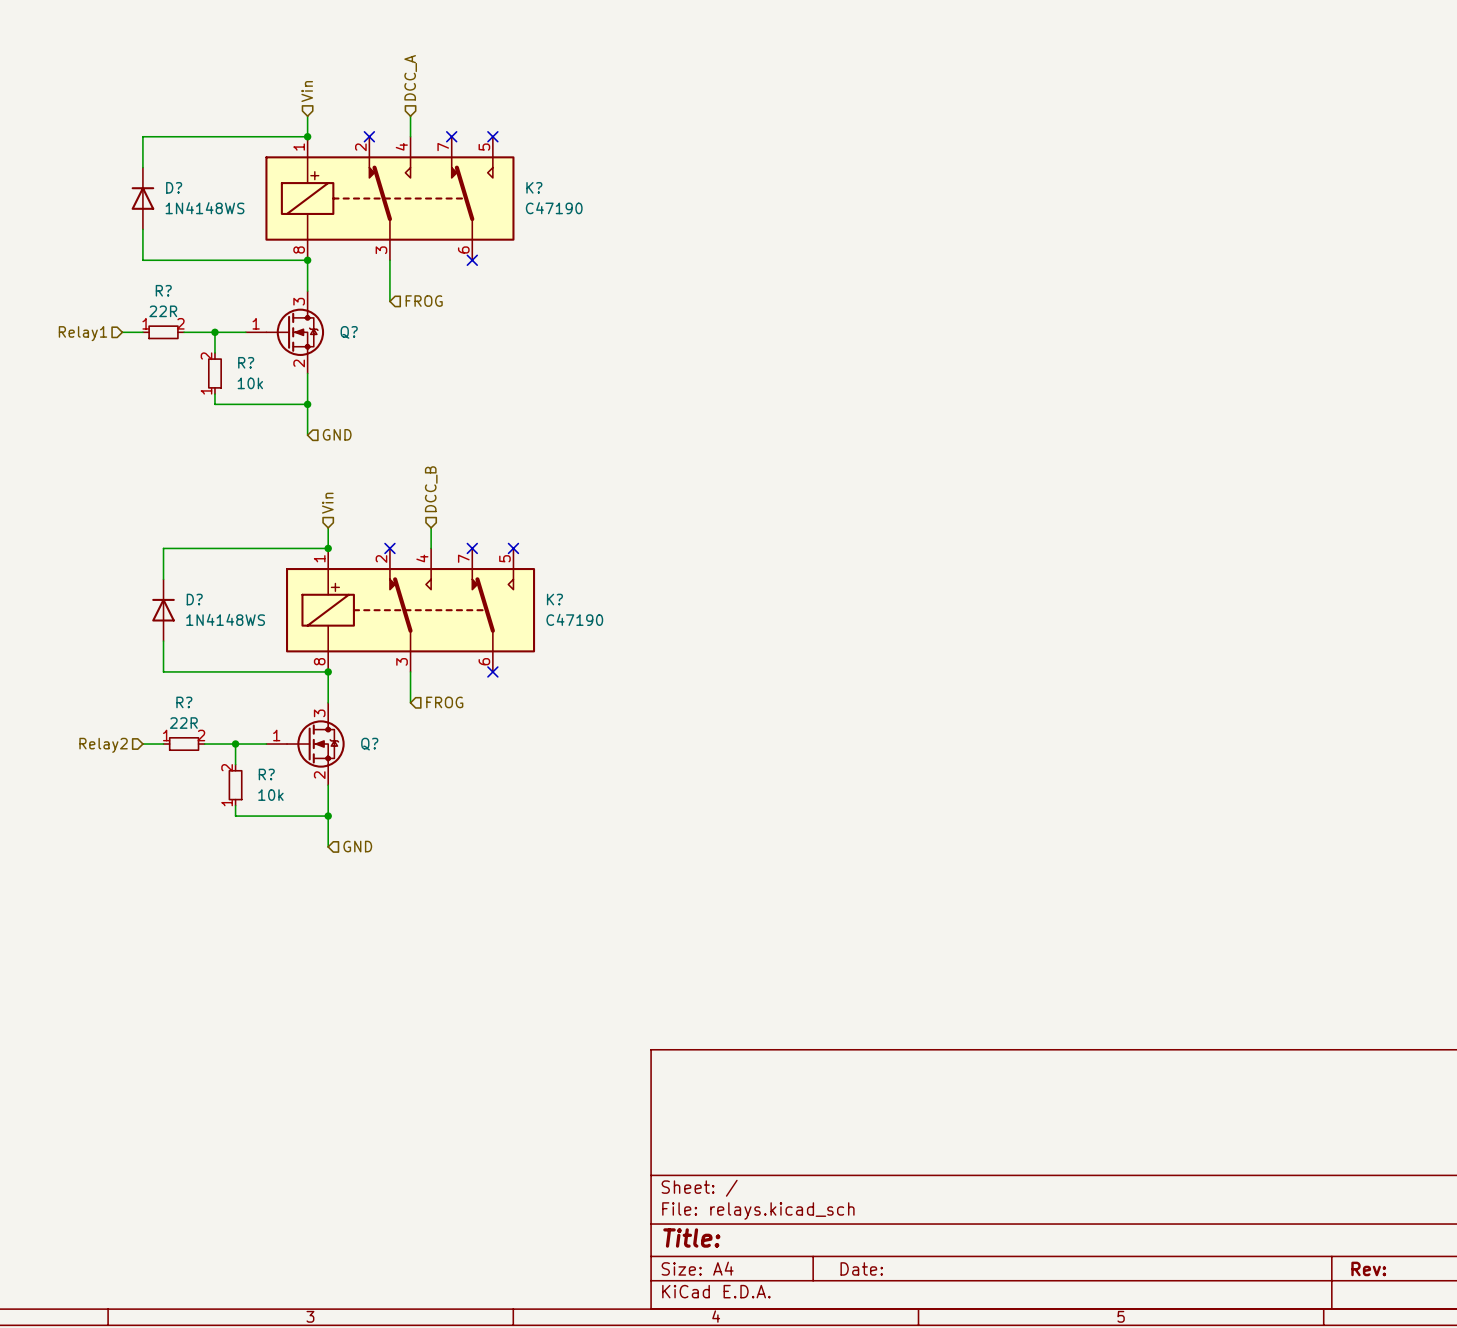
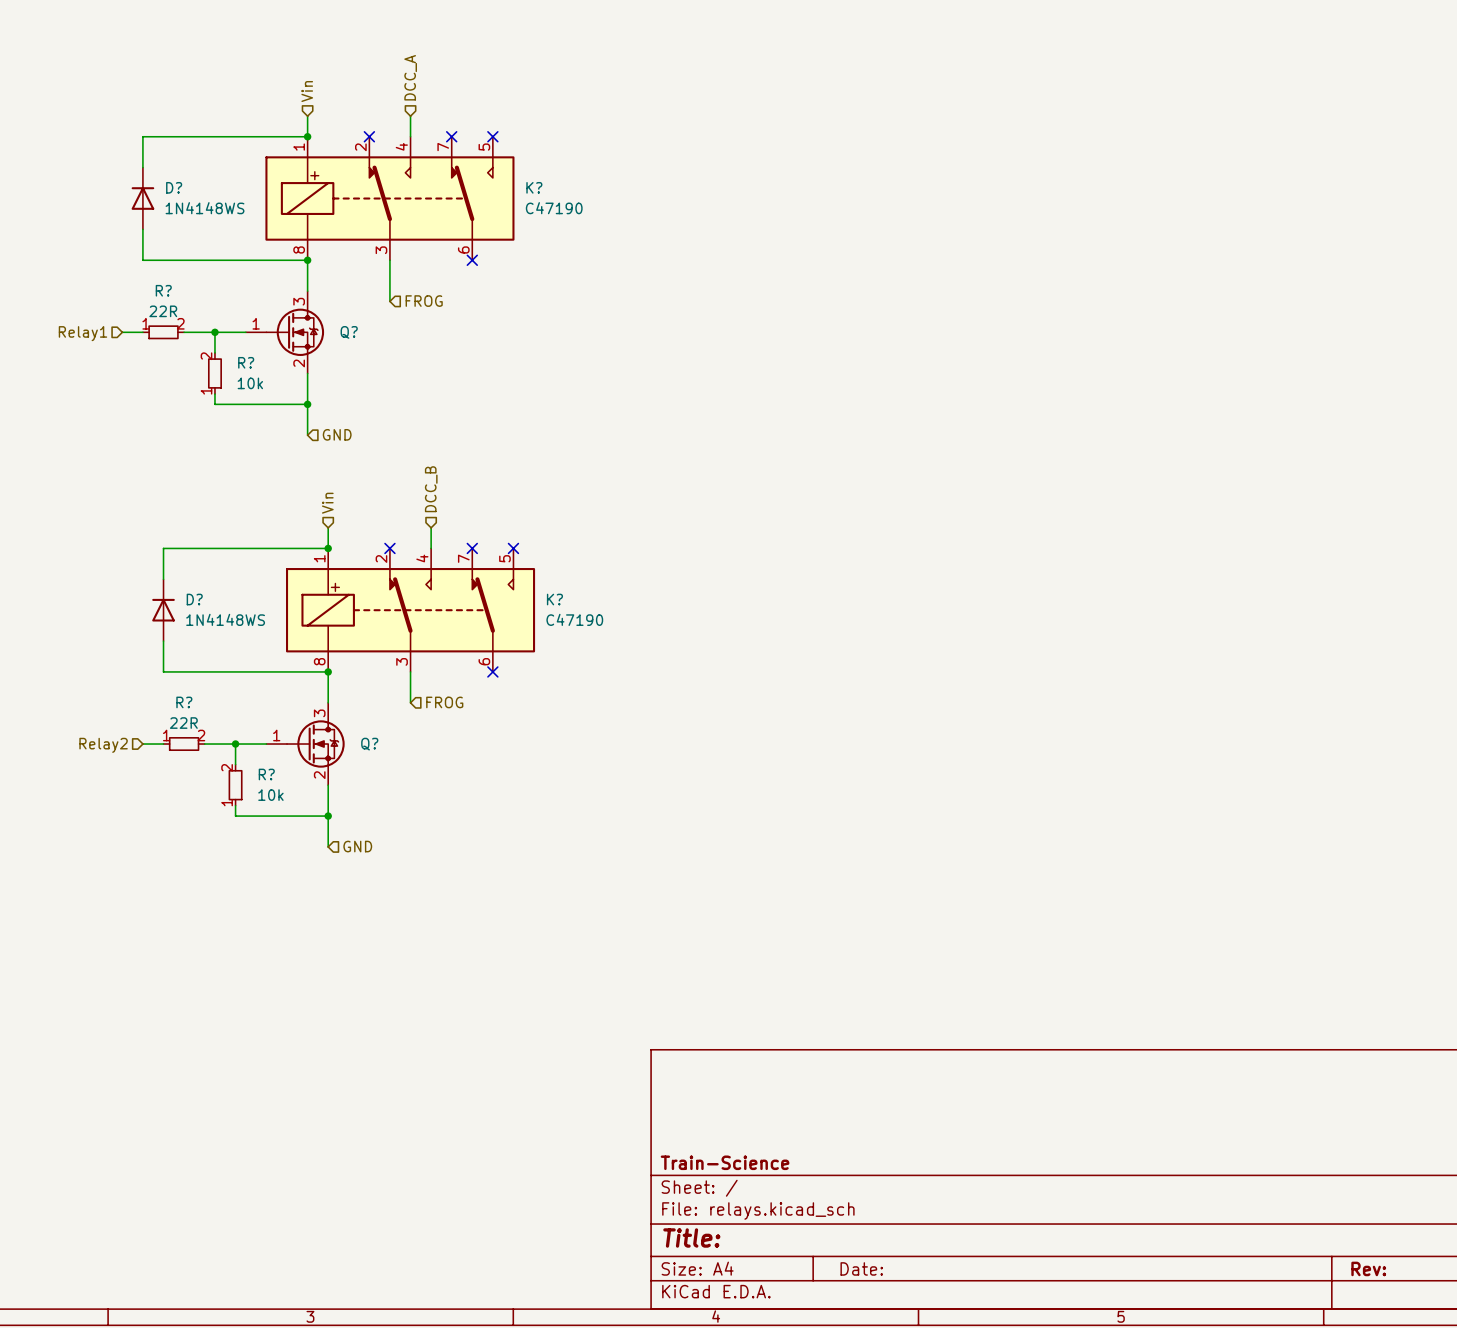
title block: none -> Train-Science (725, 1162)

